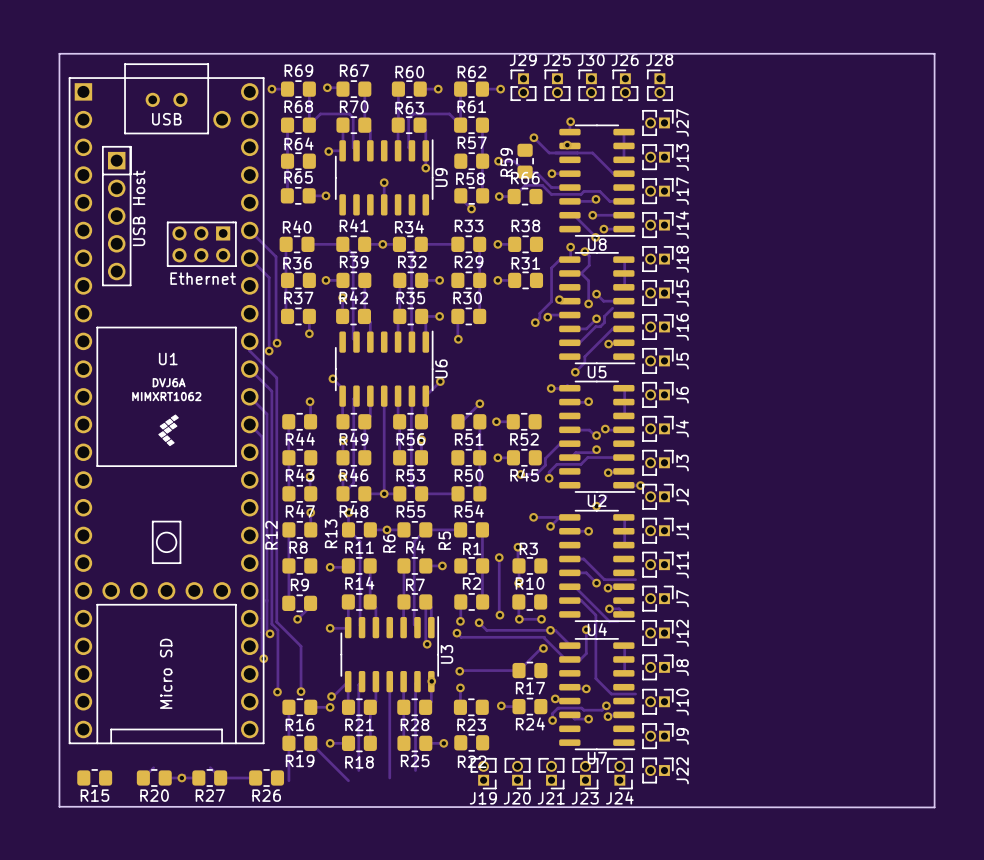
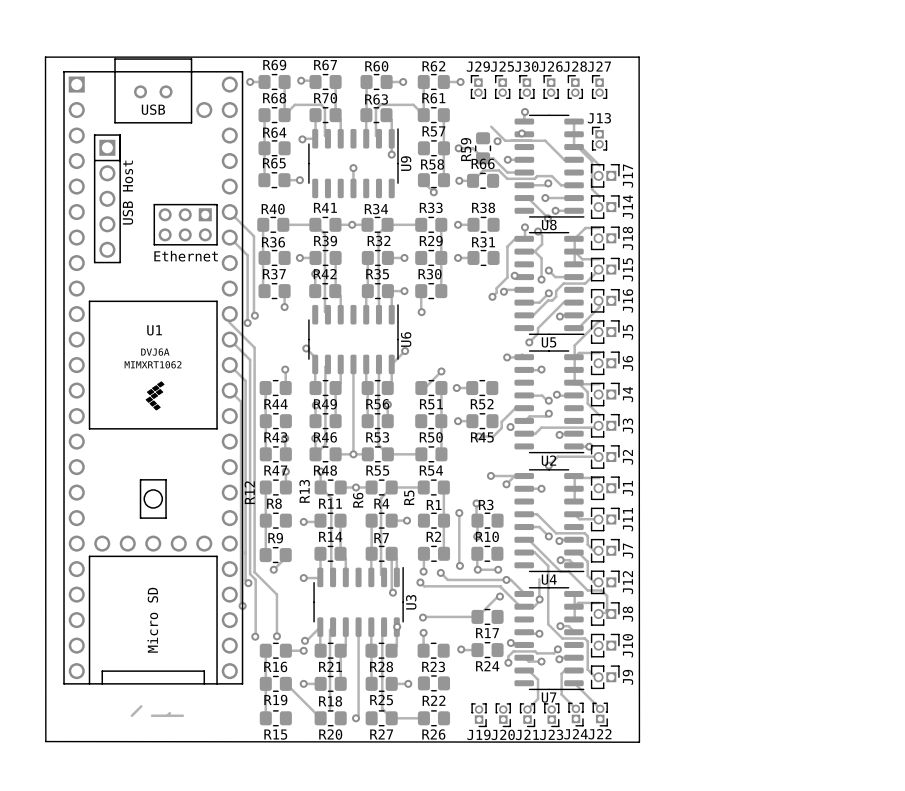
board edge: (59, 53) (59, 806) (934, 807) (934, 53) (59, 53) -> (45, 57) (45, 741) (639, 742) (639, 57) (45, 57)
J29 footprint: [510, 69, 537, 101] -> [470, 75, 487, 99]
J25 footprint: [544, 69, 571, 101] -> [495, 75, 511, 99]
J30 footprint: [578, 69, 605, 101] -> [519, 75, 535, 99]
J26 footprint: [612, 69, 639, 101] -> [543, 75, 559, 99]
J28 footprint: [647, 69, 673, 101] -> [567, 75, 583, 99]
J27 footprint: [642, 110, 674, 136] -> [592, 75, 608, 99]
J27 name position: J27 (682, 122) -> J27 (599, 66)
via position: (533, 137) -> (497, 141)
J13 footprint: [642, 144, 674, 170] -> [592, 126, 608, 151]
J13 name position: J13 (682, 157) -> J13 (599, 118)
track: none -> (577, 147) (592, 161) (592, 189) (599, 196)
track: none -> (581, 147) (599, 165)
track: none -> (599, 228) (585, 228) (574, 238)
track: none -> (574, 251) (582, 259) (599, 259)
track: none -> (599, 269) (585, 283) (563, 283)
track: none -> (599, 300) (599, 307) (578, 328) (574, 328)
track: none -> (599, 321) (574, 345) (574, 357) (579, 352) (599, 352)
track: none -> (599, 384) (575, 384) (574, 382) (578, 382) (587, 392) (587, 403) (599, 415)
track: (623, 457) (587, 457) (580, 464) (556, 464) (549, 472) (549, 478) -> none
track: none -> (597, 427) (541, 427) (535, 433) (525, 433)
via position: (549, 478) -> (510, 427)
track: none -> (557, 456) (599, 456)
track: none -> (576, 477) (599, 477)
track: none -> (574, 514) (579, 519) (599, 519)
track: none -> (584, 533) (587, 536) (587, 544) (593, 550) (599, 550)
track: none -> (574, 552) (578, 552) (587, 561) (587, 575) (593, 581) (599, 581)
track: none -> (568, 571) (587, 590) (601, 590) (607, 596) (606, 612) (599, 612)
via position: (586, 629) -> (539, 599)
track: none -> (599, 602) (578, 602) (574, 606)
track: none -> (560, 626) (568, 626) (574, 632)
via: none -> (560, 626)
track: none -> (584, 638) (587, 641) (587, 669) (593, 675) (599, 675)
track: none -> (525, 670) (528, 670) (538, 679) (538, 699) (527, 709)
track: none -> (574, 670) (564, 670) (561, 673) (561, 694) (575, 708)
track: none -> (574, 683) (600, 708)
J22 footprint: [642, 757, 674, 784] -> [592, 702, 608, 727]
J19 footprint: [470, 758, 497, 790] -> [471, 703, 487, 728]
J20 footprint: [504, 758, 531, 790] -> [495, 703, 511, 728]
J21 footprint: [538, 758, 565, 790] -> [519, 703, 536, 728]
J23 footprint: [572, 758, 599, 790] -> [544, 703, 560, 728]
J24 footprint: [607, 758, 633, 790] -> [568, 702, 584, 727]
track: (210, 767) (220, 777) (255, 777) -> (382, 708) (391, 718) (423, 718)
J22 name position: J22 (682, 770) -> J22 (600, 734)
R15 position: (94, 777) -> (275, 718)
R20 position: (154, 777) -> (330, 718)
via: (181, 777) -> none
R27 position: (209, 777) -> (381, 718)
R26 position: (266, 777) -> (433, 718)
via: none -> (356, 718)

